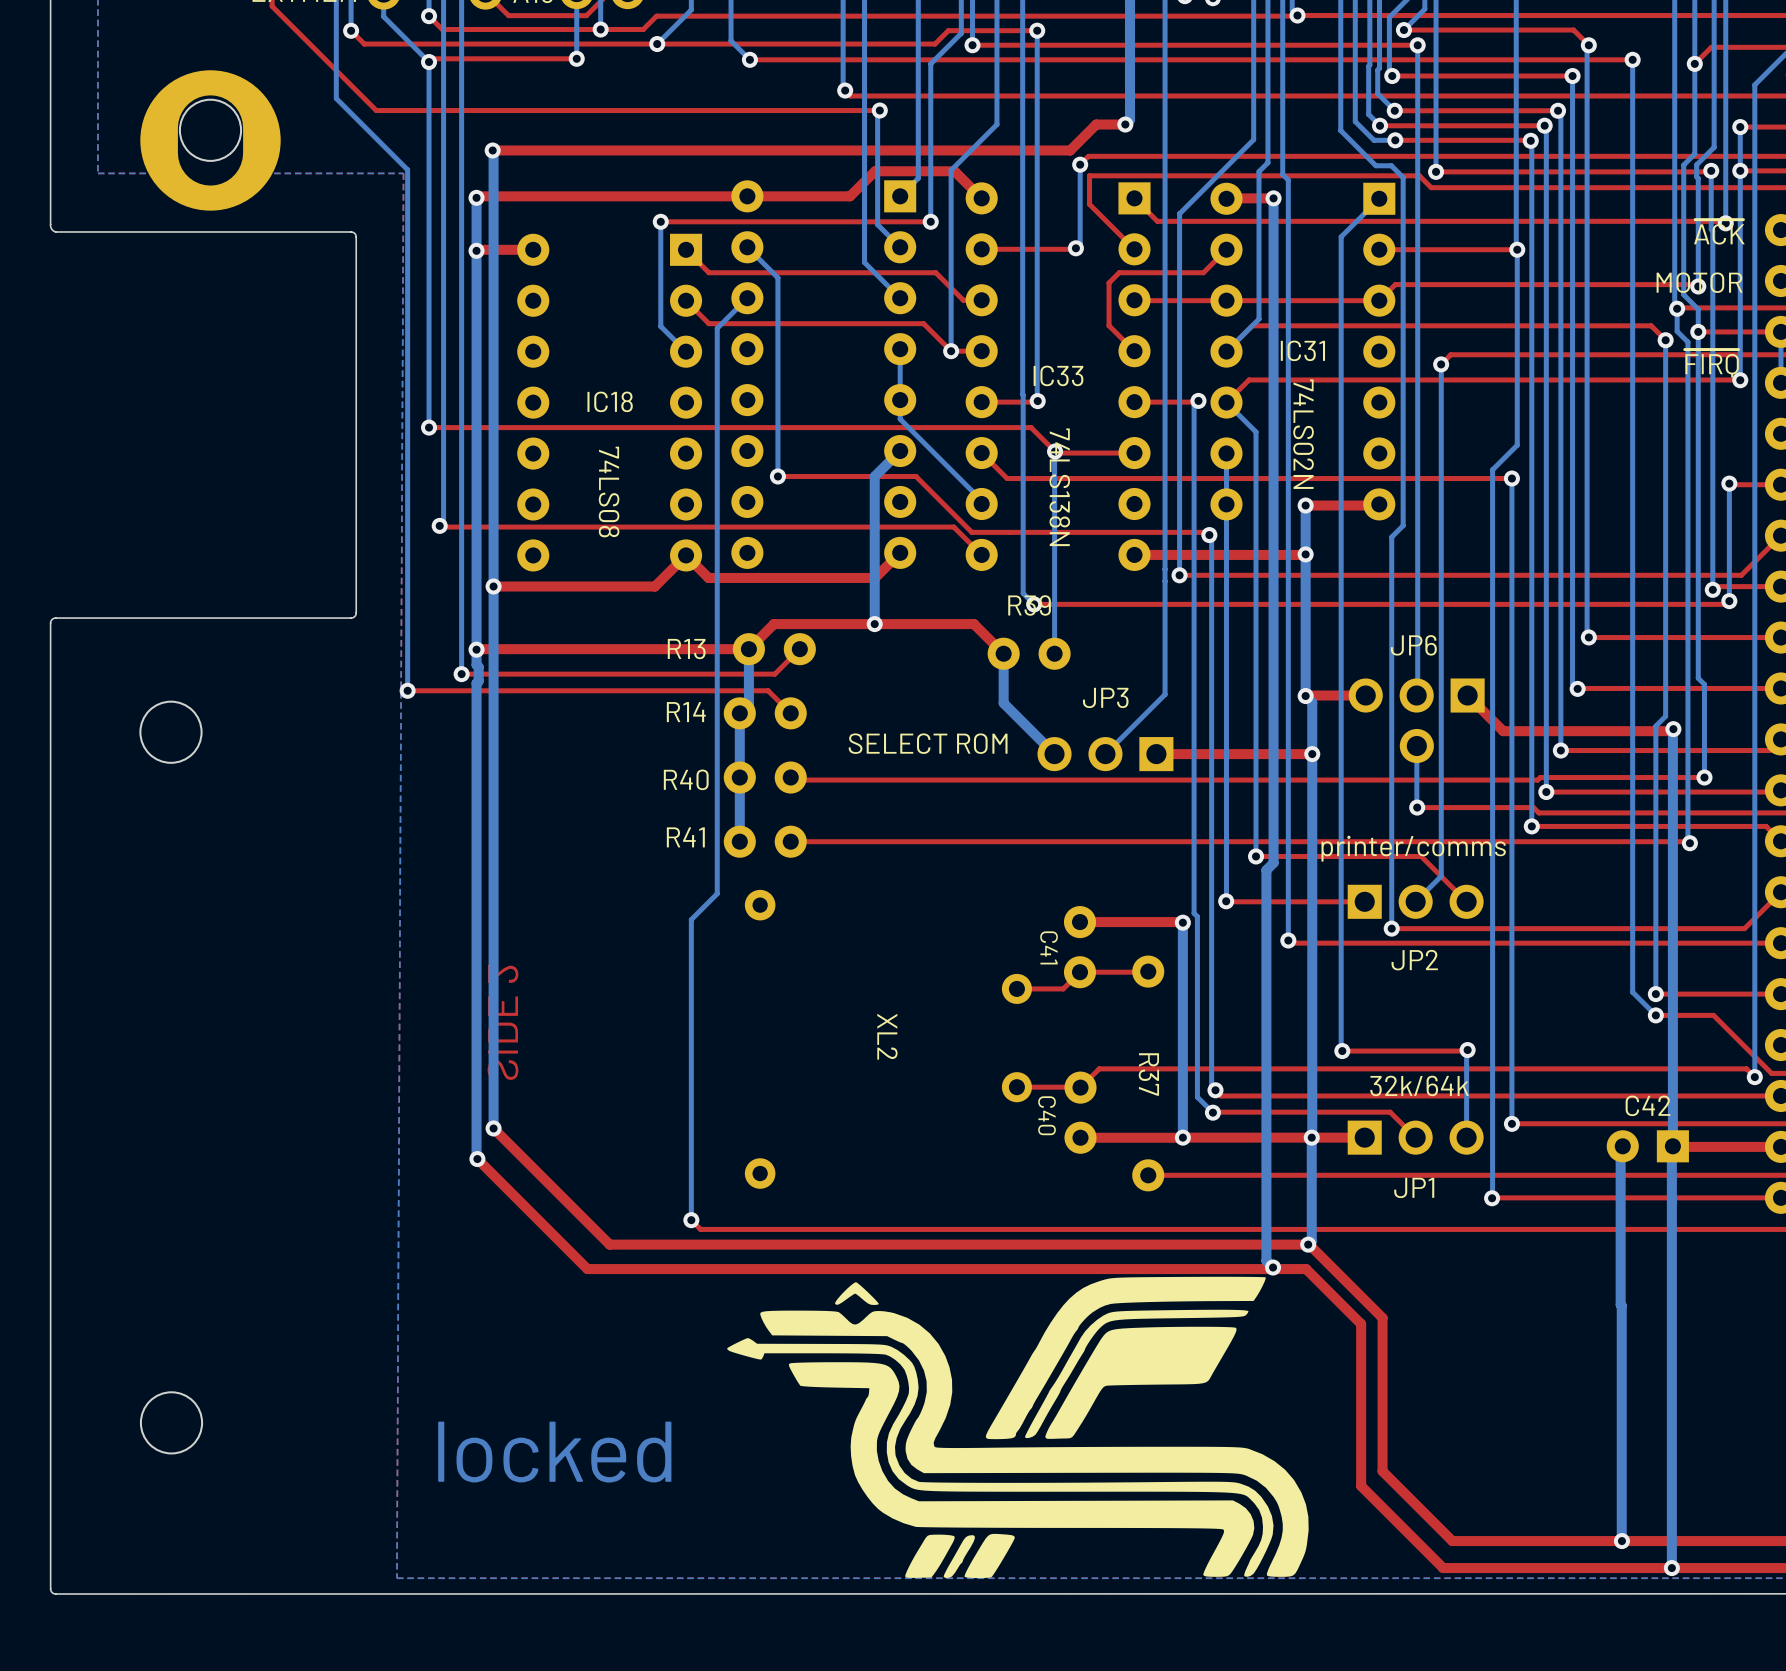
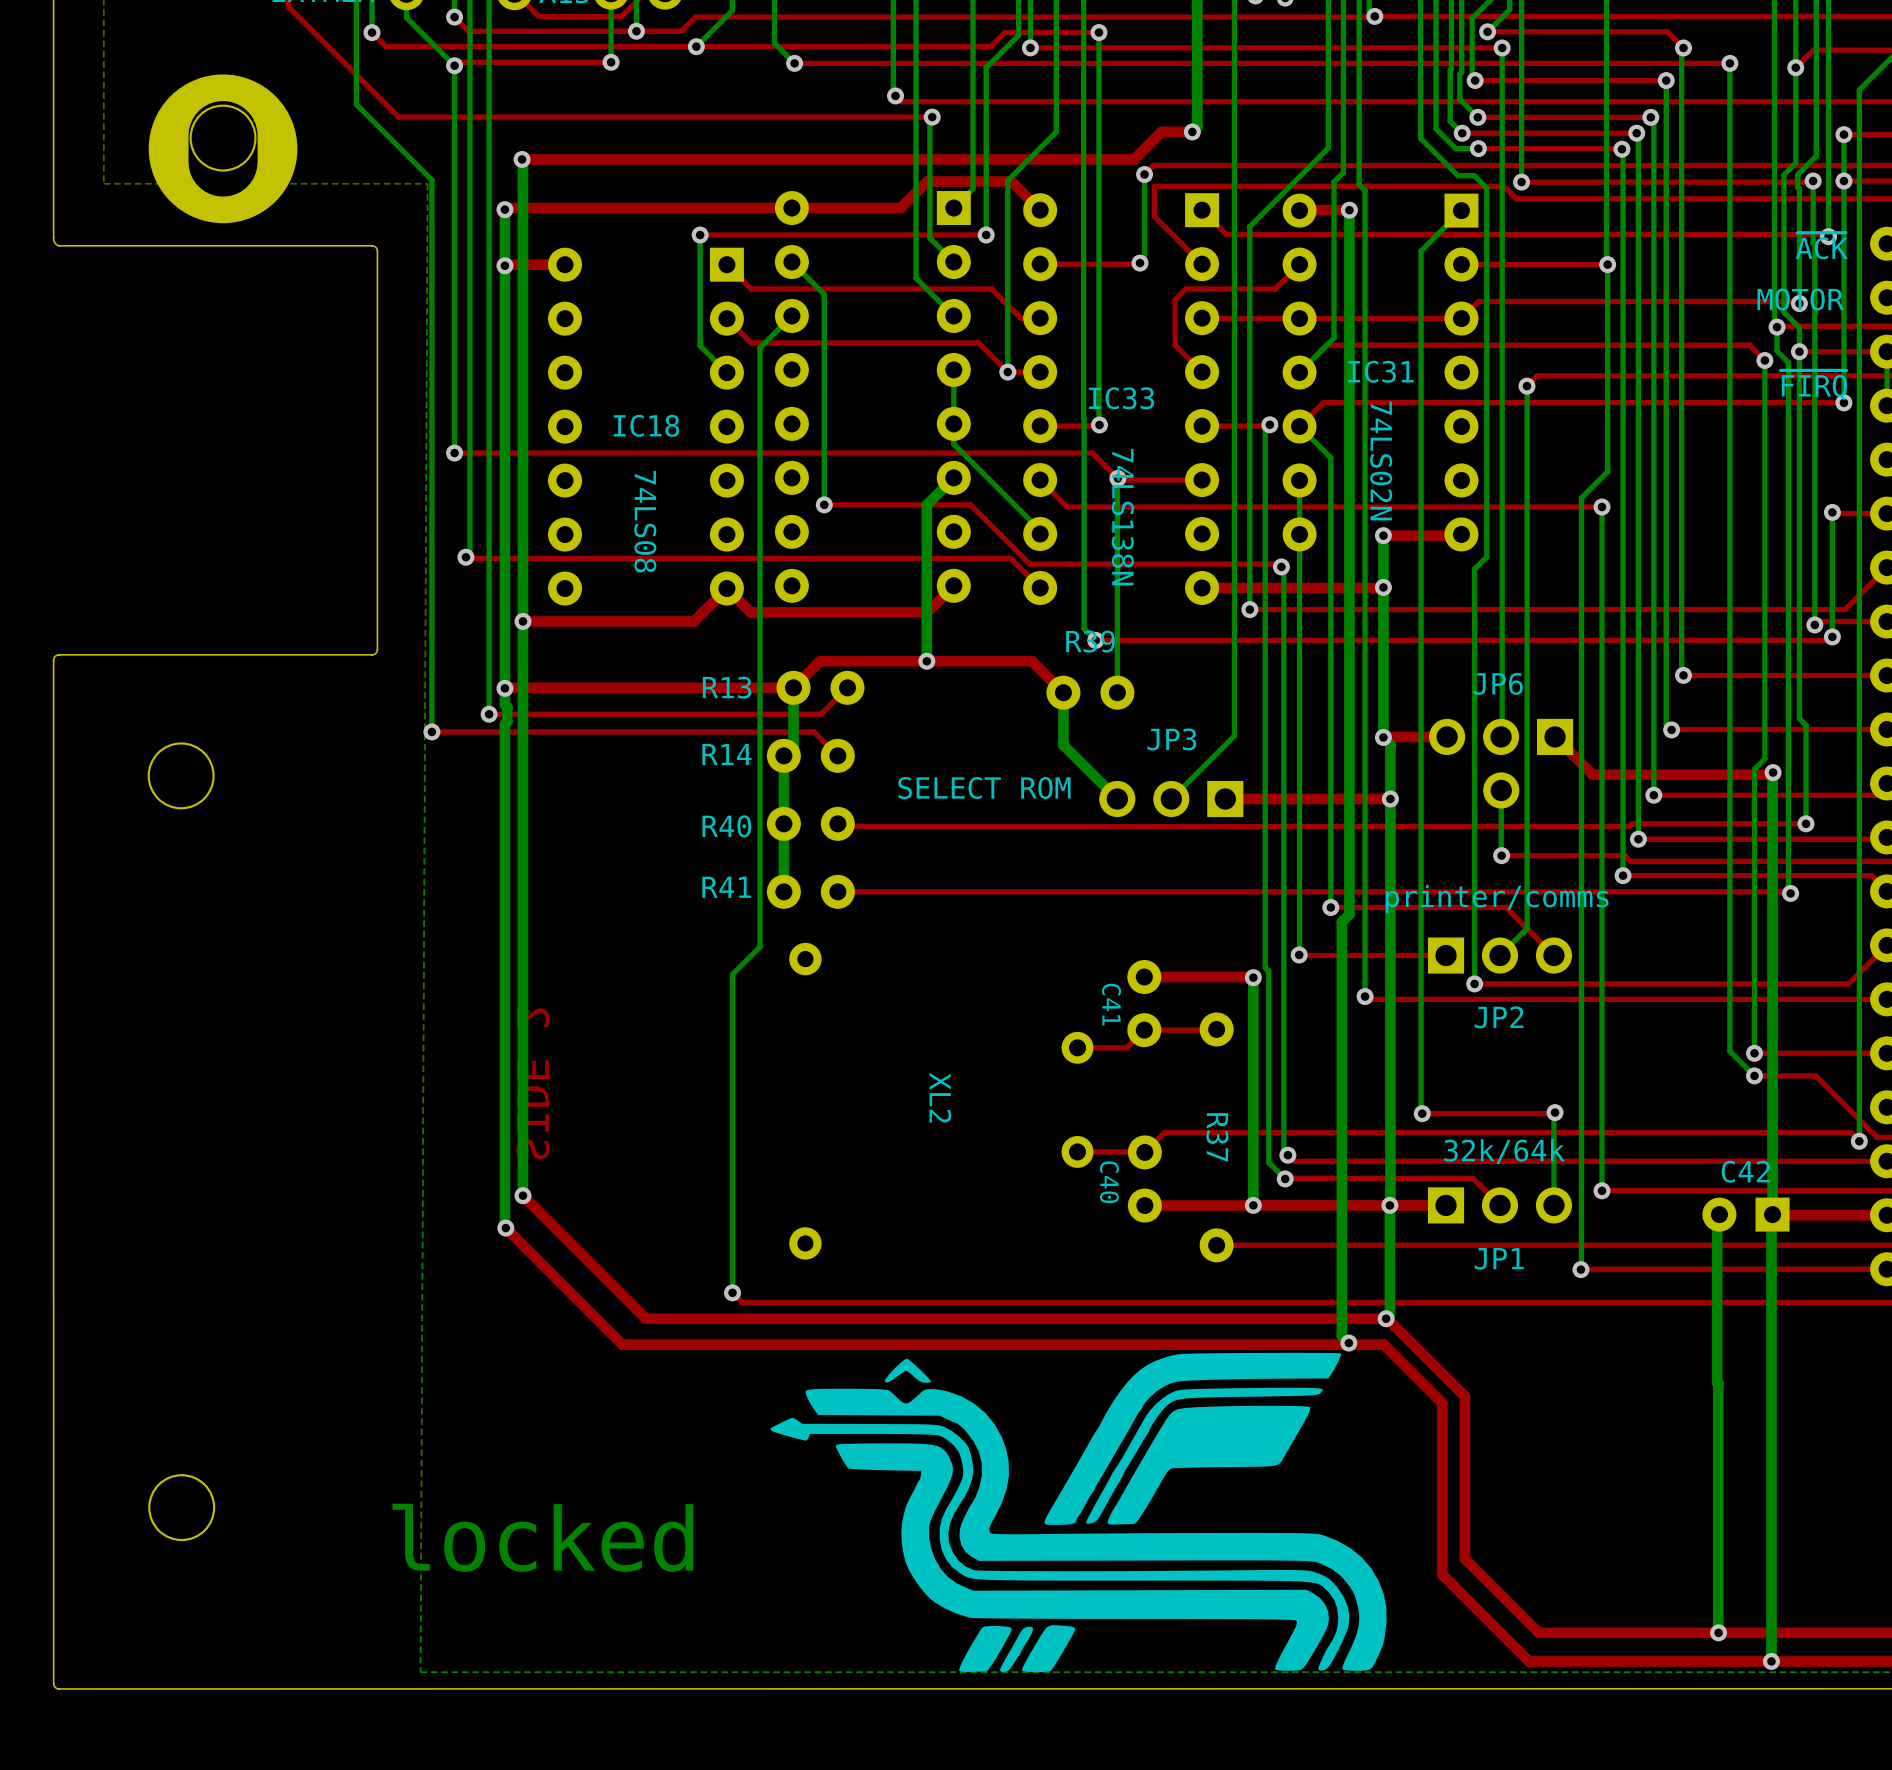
text position: locked (554, 1452) -> locked (542, 1537)

